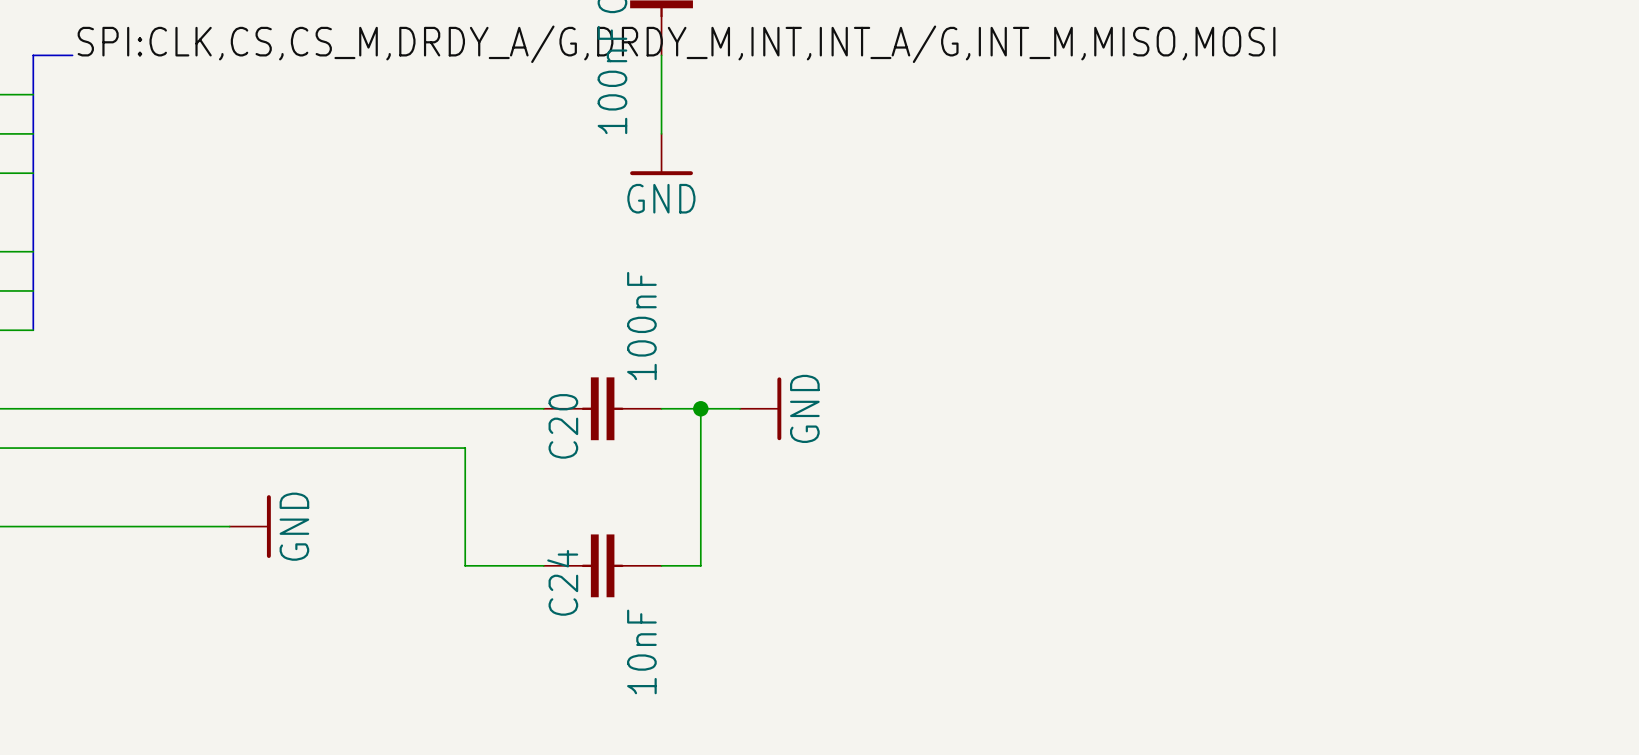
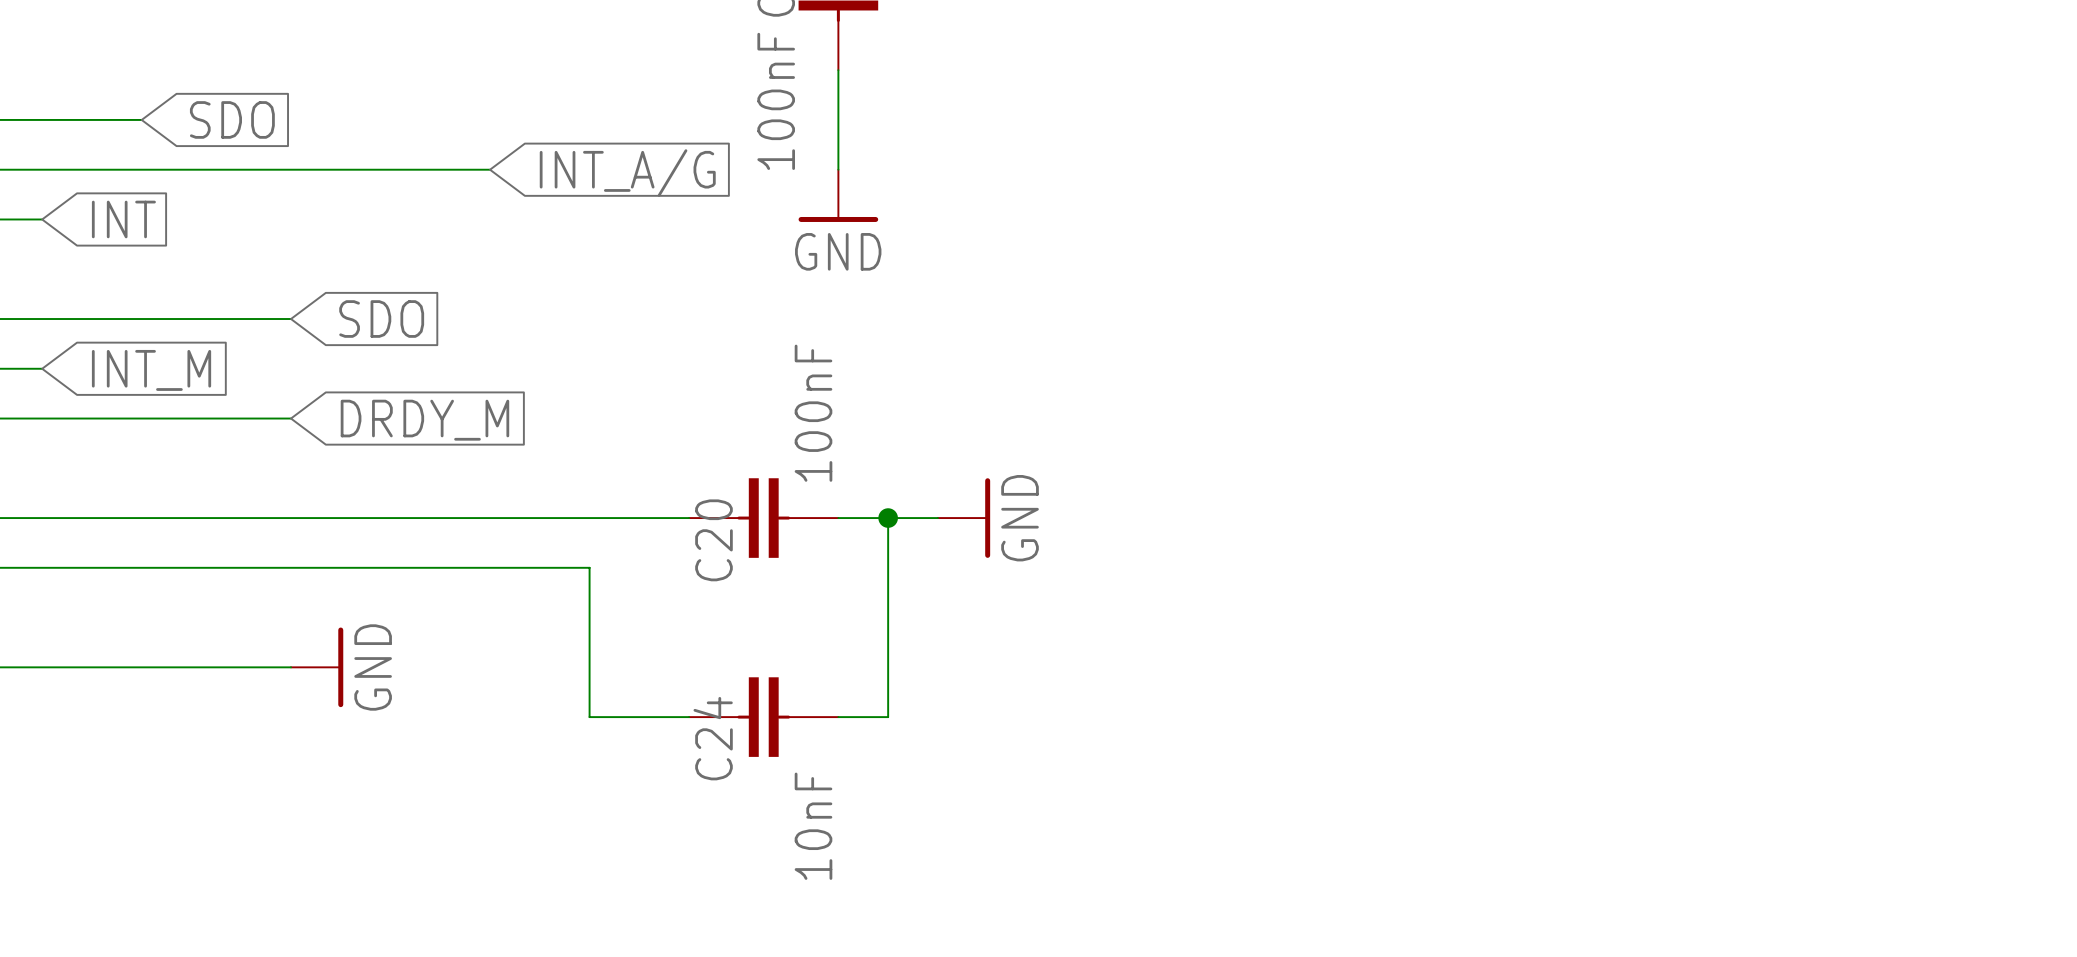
label: SPI:CLK,CS,CS_M,DRDY_A/G,DRDY_M,INT,INT_A/G,INT_M,MISO,MOSI (676, 44) -> none
bus: (72, 55) (33, 55) (33, 330) -> none
wire: none -> (42, 119) (141, 119)
global label: none -> SDO (232, 119)
wire: none -> (42, 169) (490, 169)
global label: none -> INT_A/G (627, 173)
global label: none -> INT (123, 219)
wire: none -> (42, 319) (291, 319)
global label: none -> SDO (381, 319)
global label: none -> INT_M (151, 370)
wire: none -> (42, 418) (291, 418)
global label: none -> DRDY_M (424, 420)

